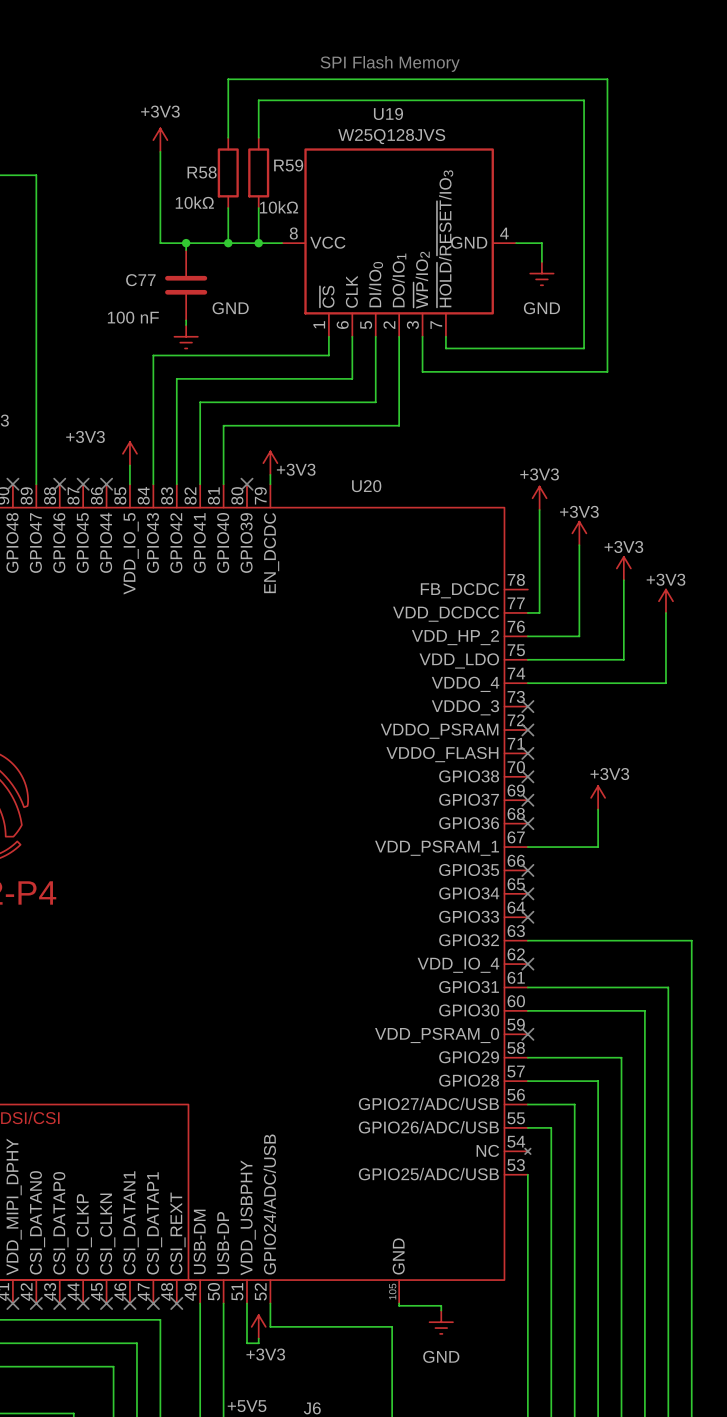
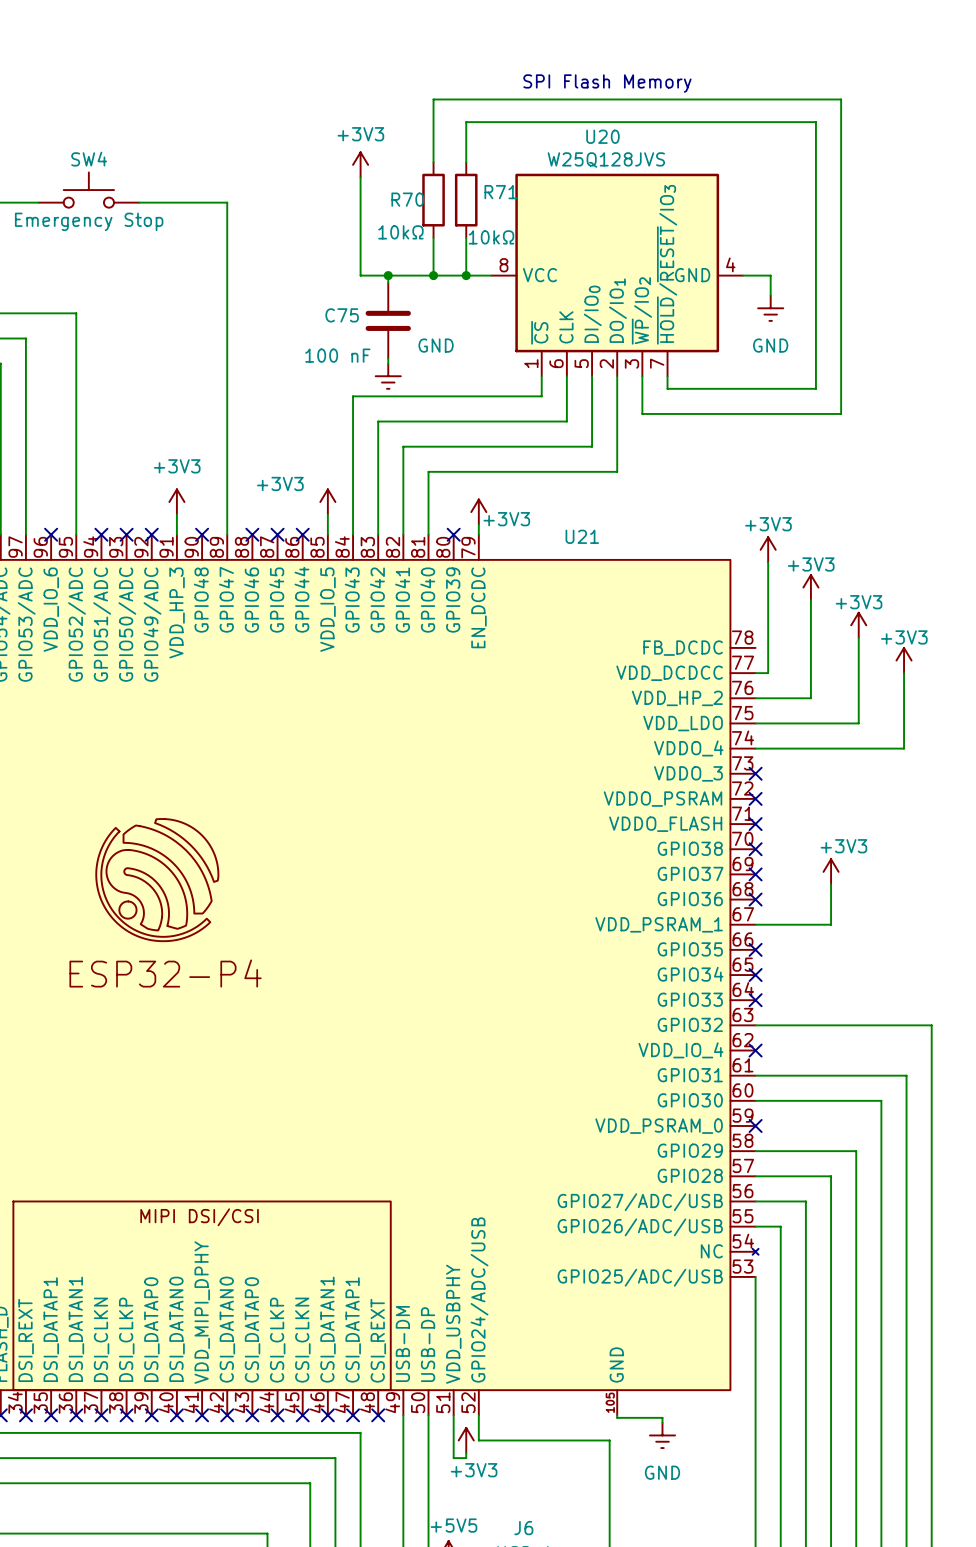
U19 name: U19 (388, 113) -> U20 (602, 136)
R59 name: R59 (288, 165) -> R71 (500, 192)
R58 name: R58 (202, 172) -> R70 (407, 199)
C77 name: C77 (140, 280) -> C75 (342, 315)
U20 name: U20 (366, 486) -> U21 (582, 536)

